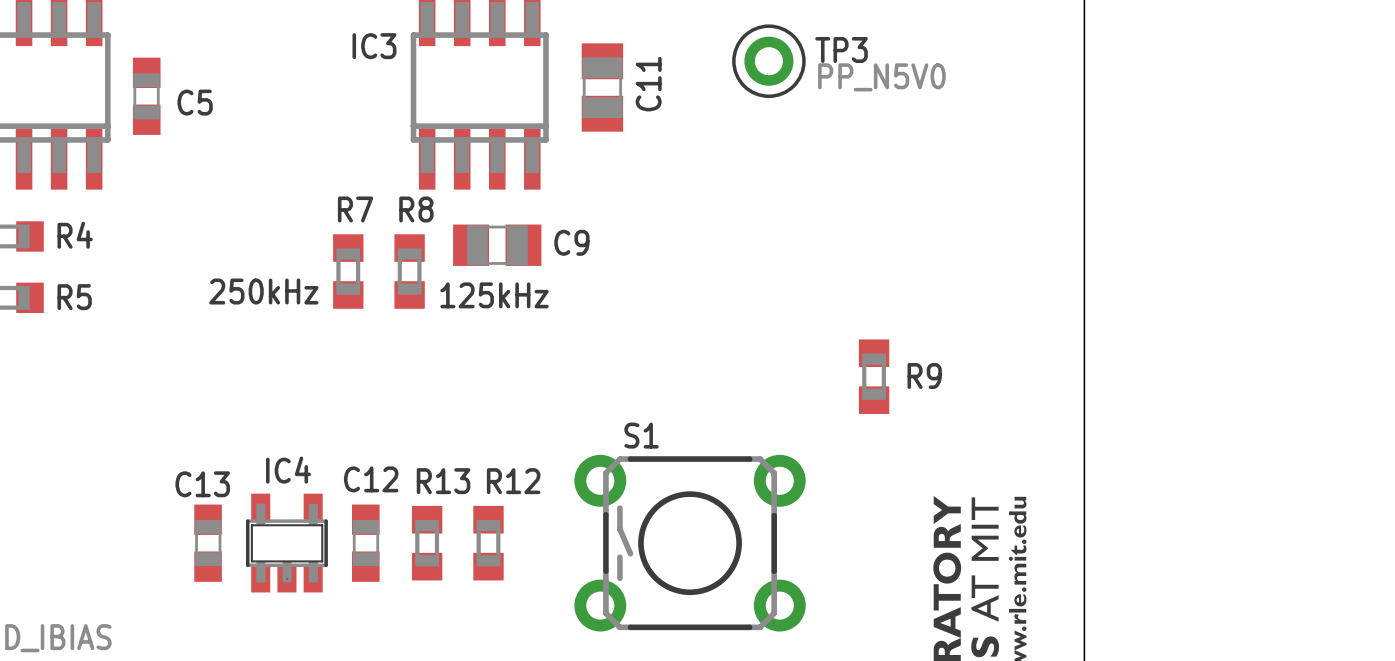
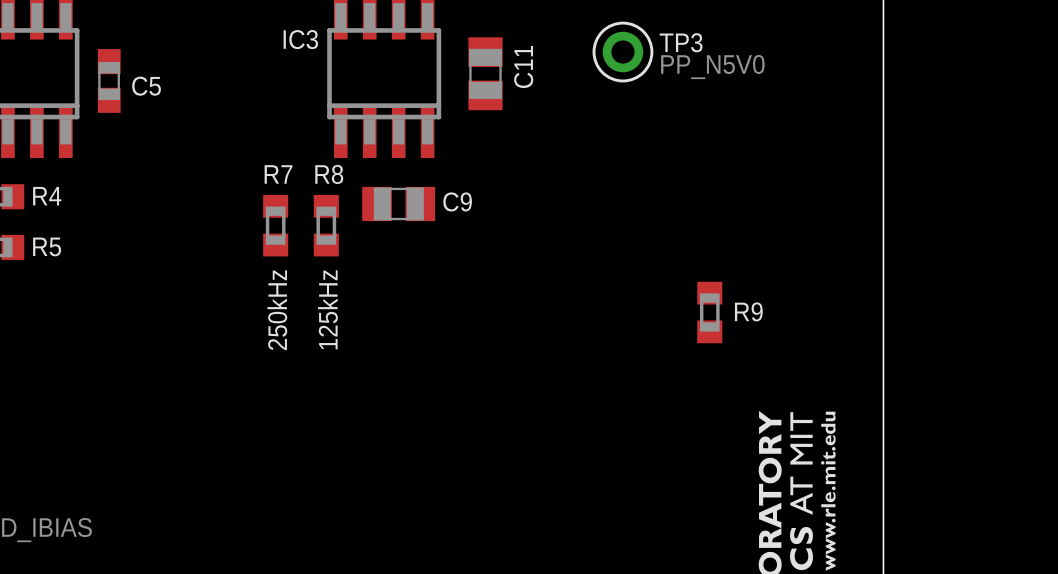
text rotation: 0° (263, 291) -> 90° counterclockwise (277, 310)
text position: 250kHz (263, 291) -> 250kHz (277, 310)
text rotation: 0° (494, 295) -> 90° counterclockwise (327, 309)
C13: (208, 543) -> none
IC4: (286, 543) -> none
C12: (365, 543) -> none
R13: (427, 543) -> none
R12: (488, 543) -> none
S1: (690, 543) -> none

